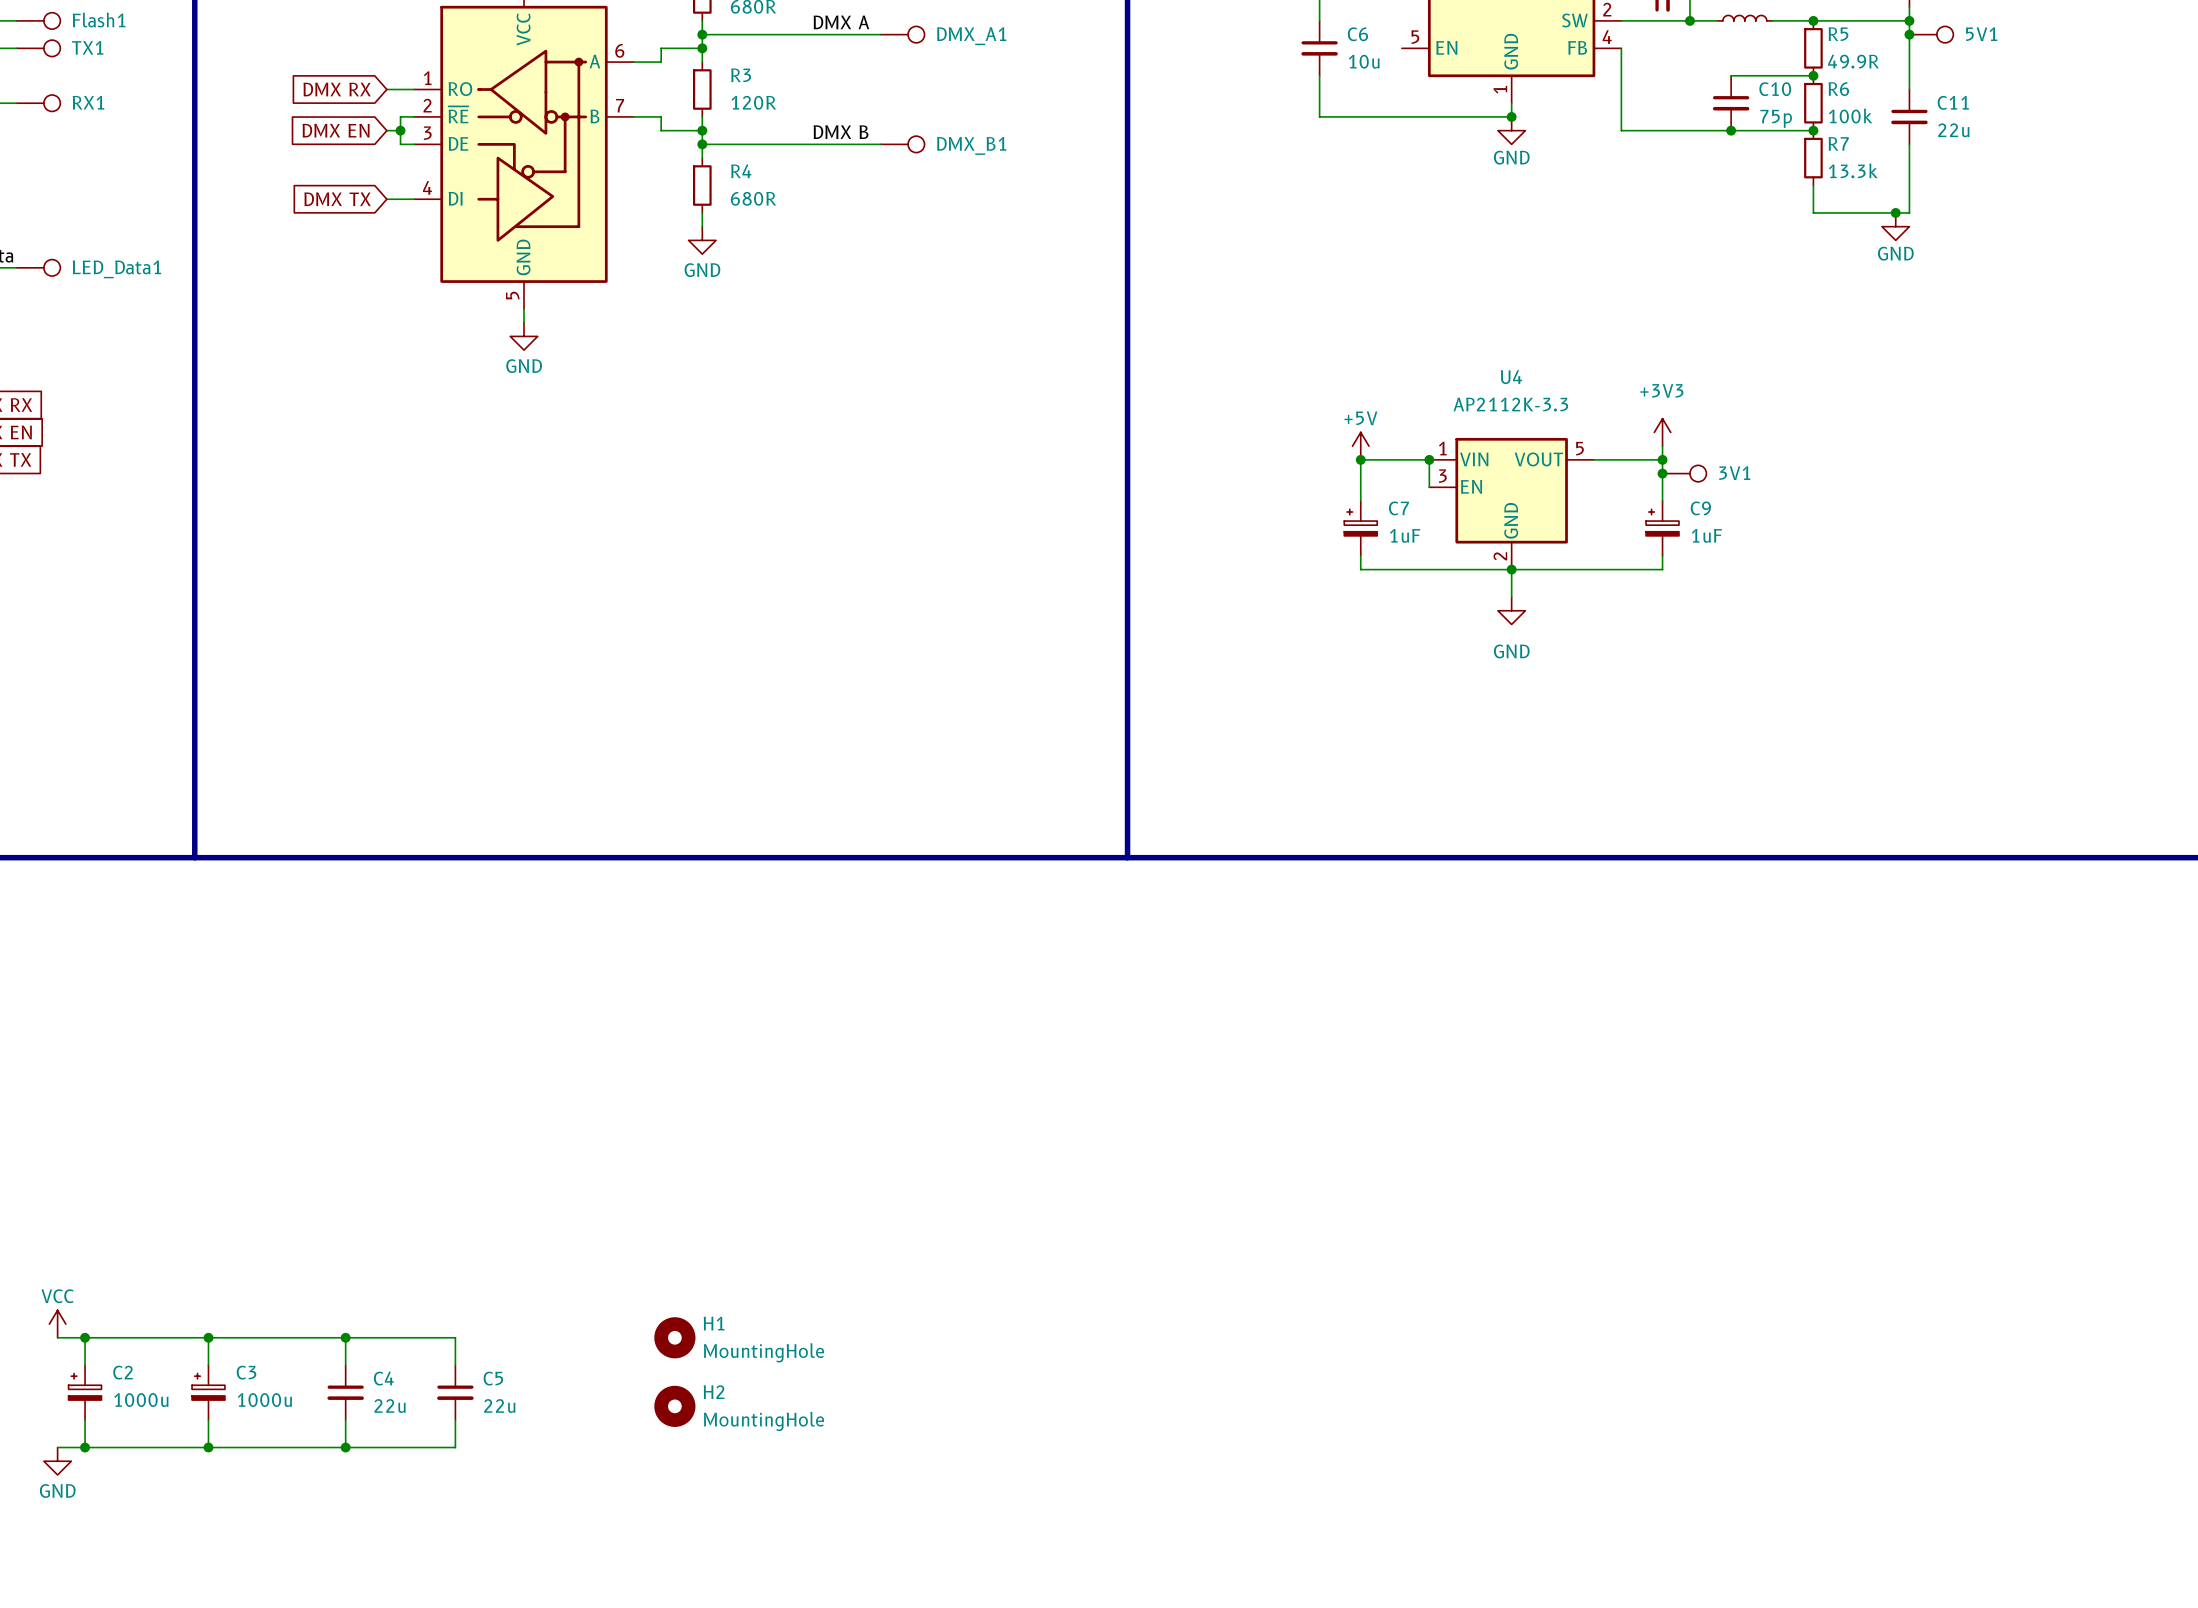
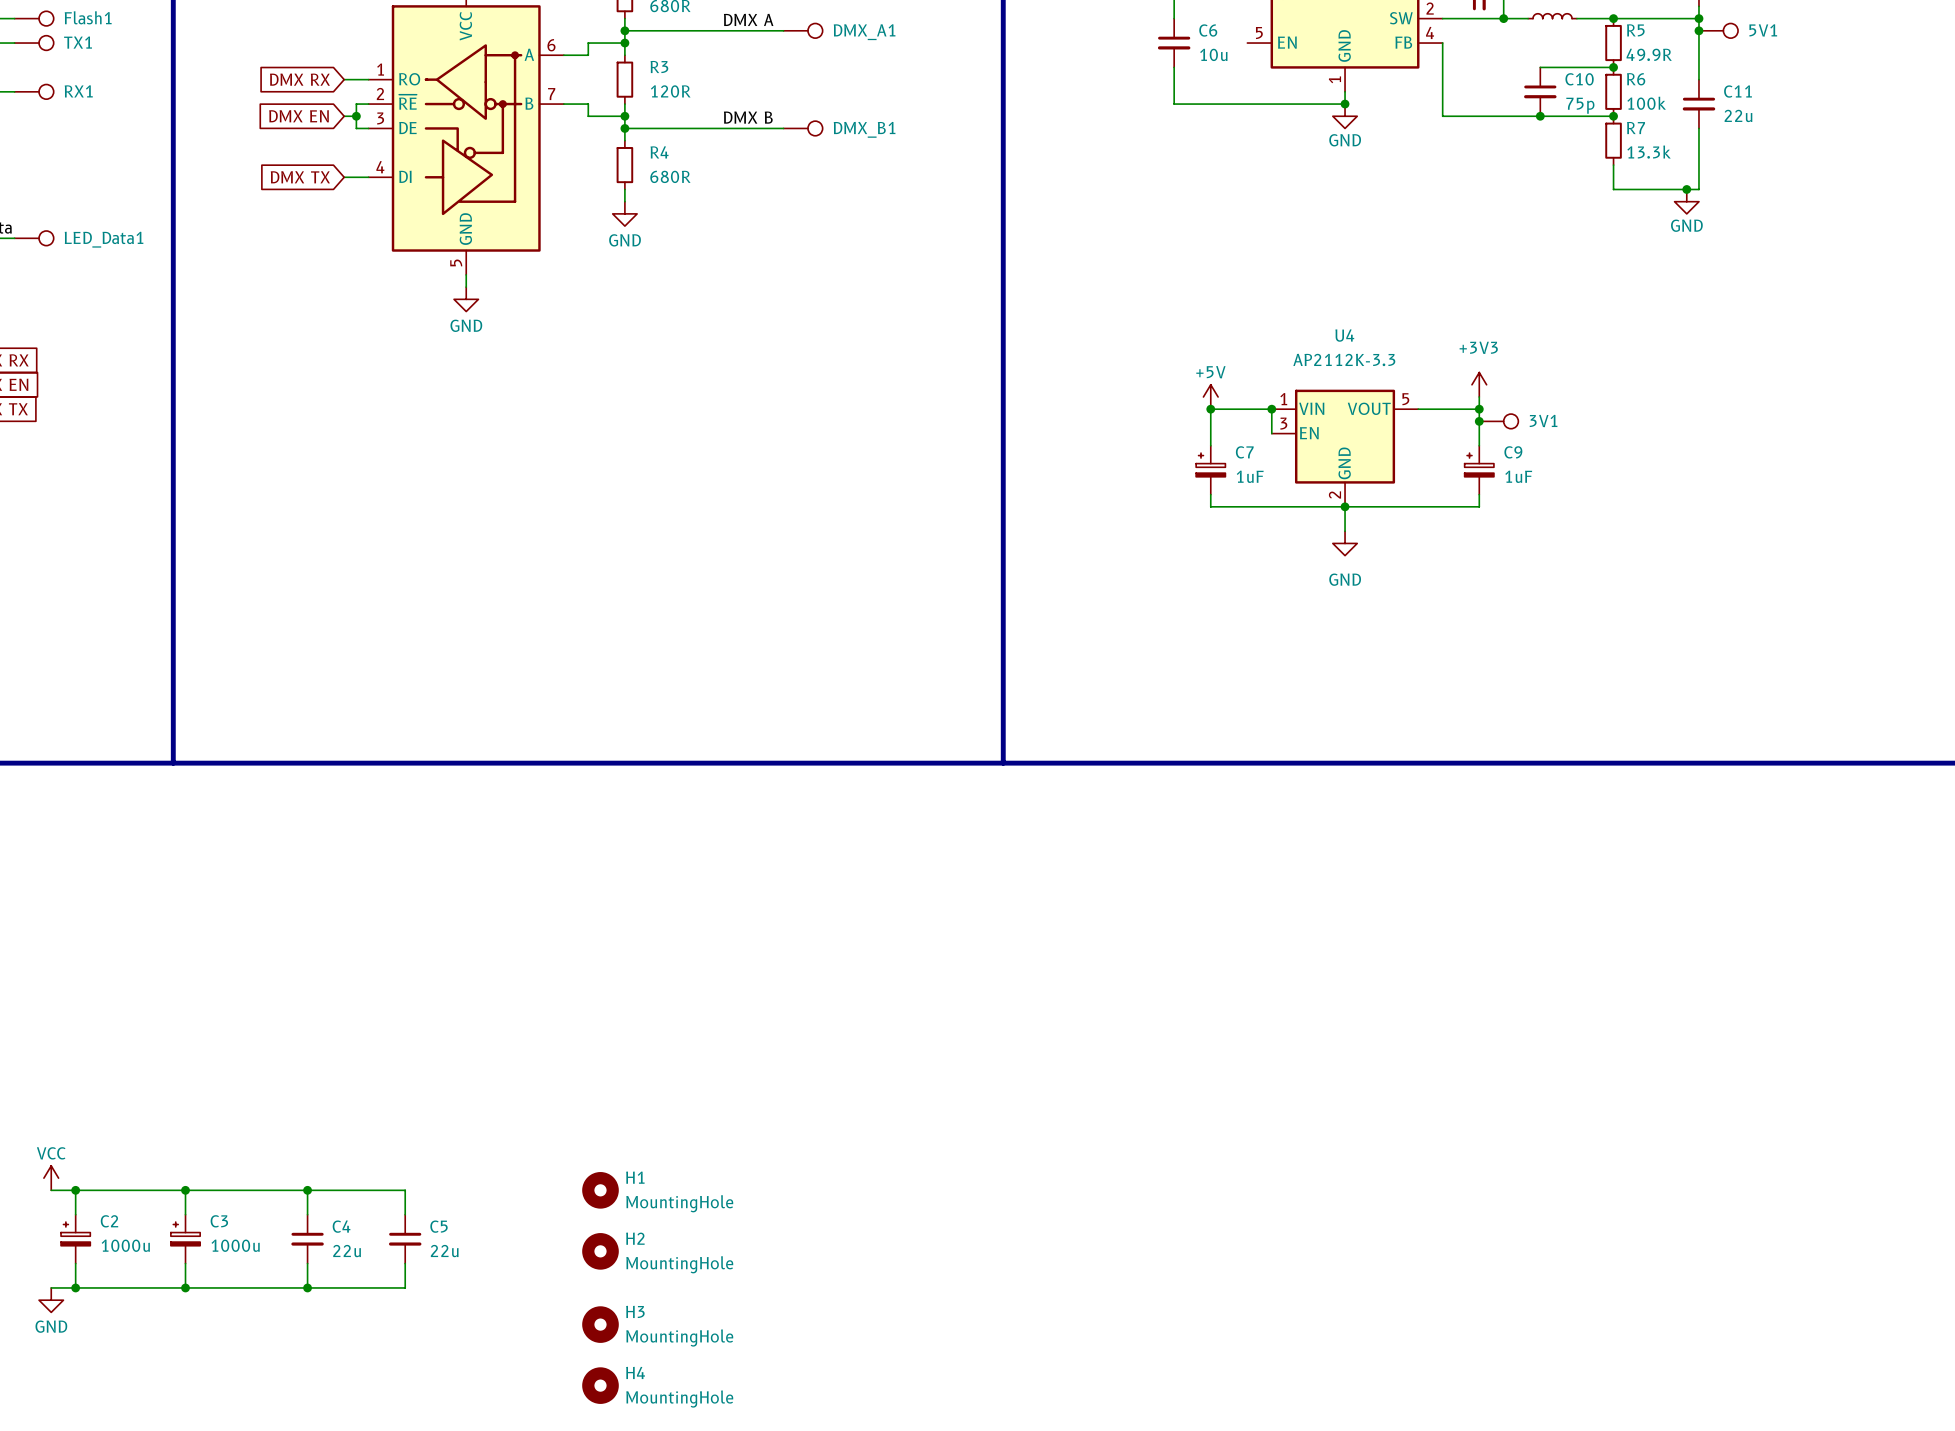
H3: none -> MountingHole (600, 1324)
H4: none -> MountingHole (600, 1385)

